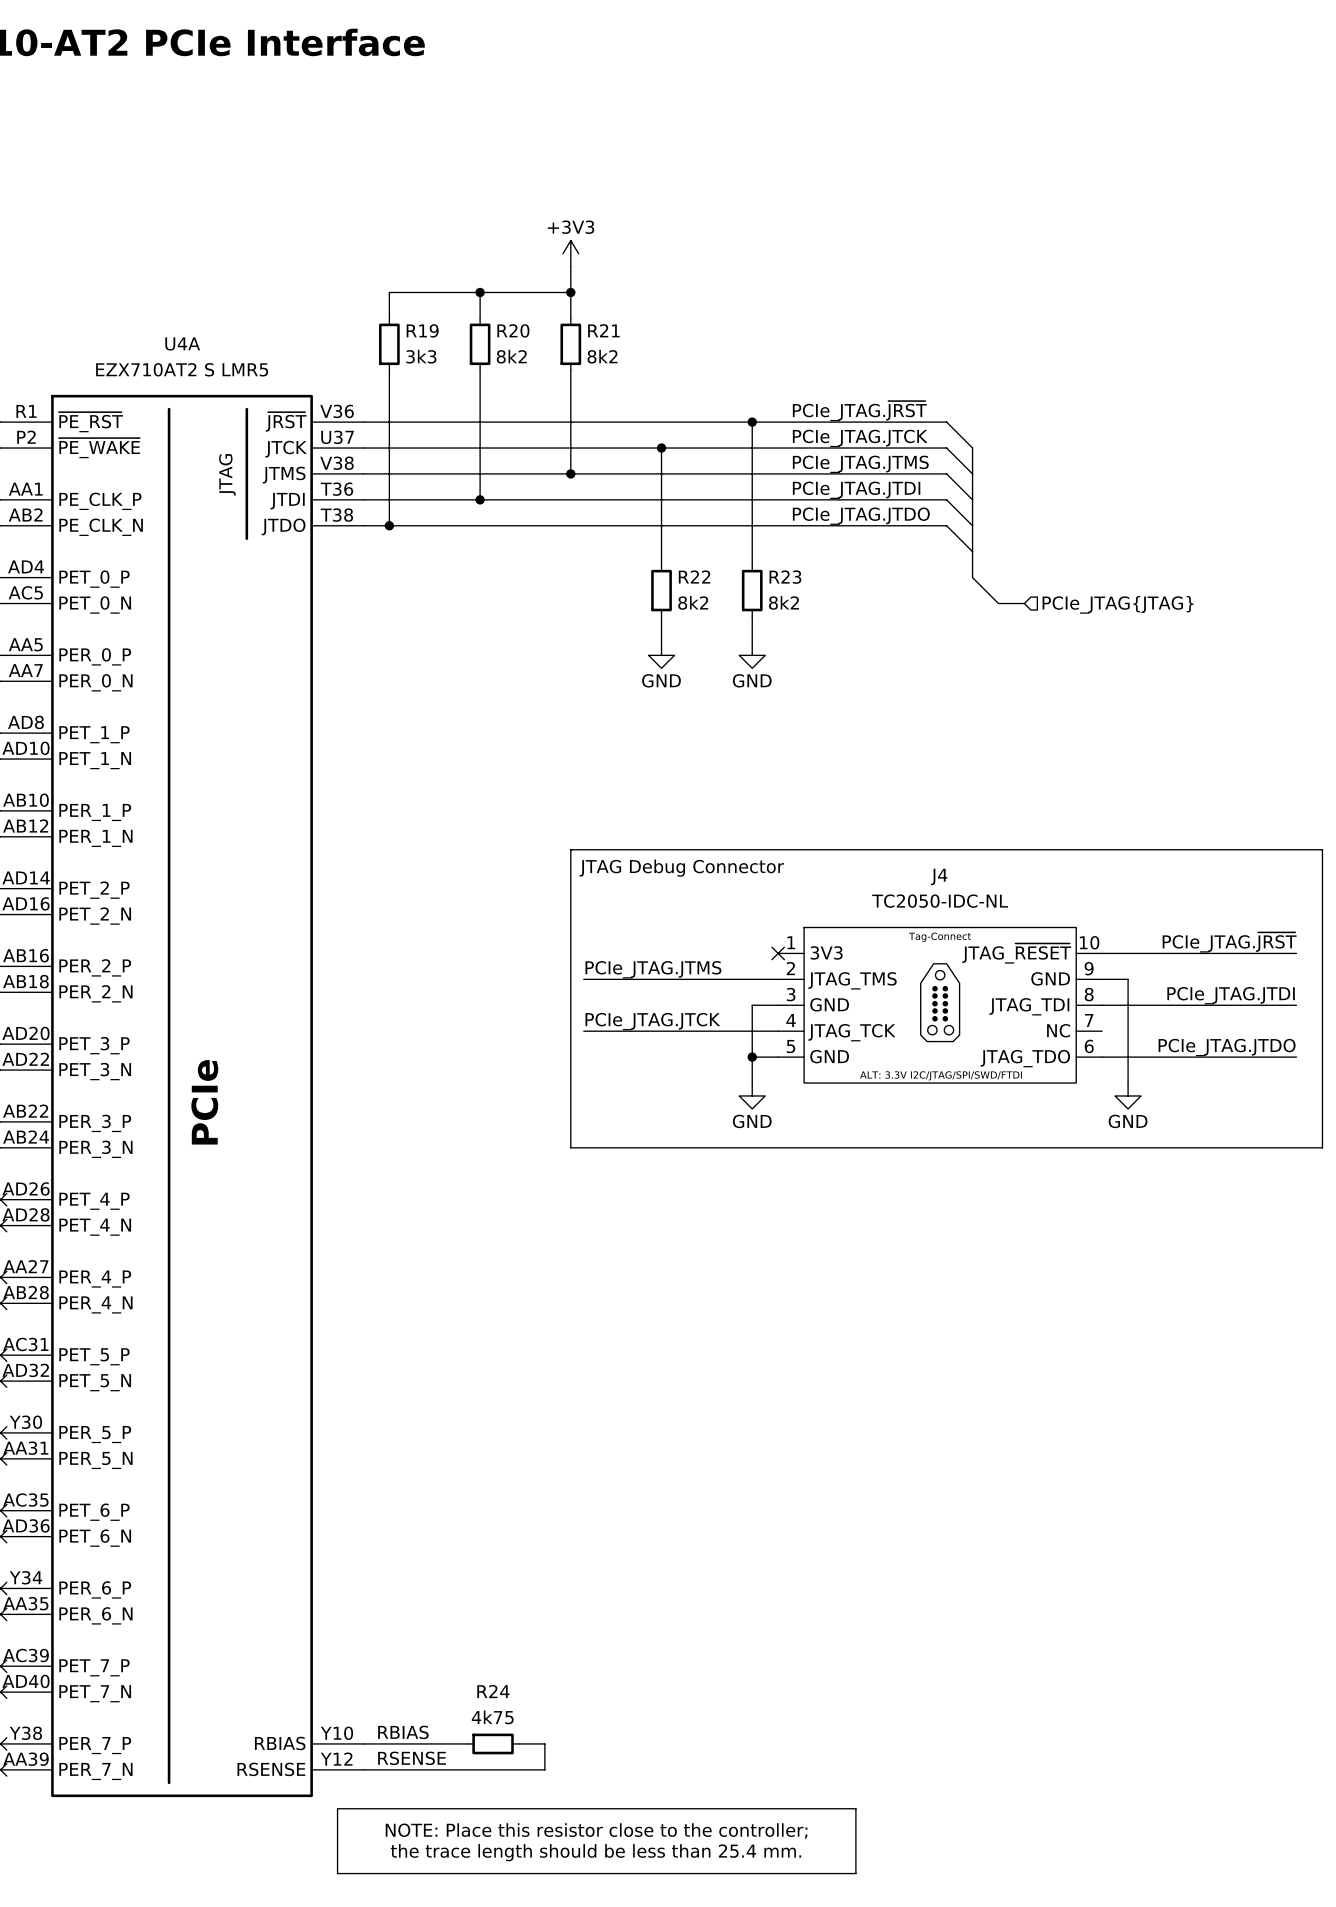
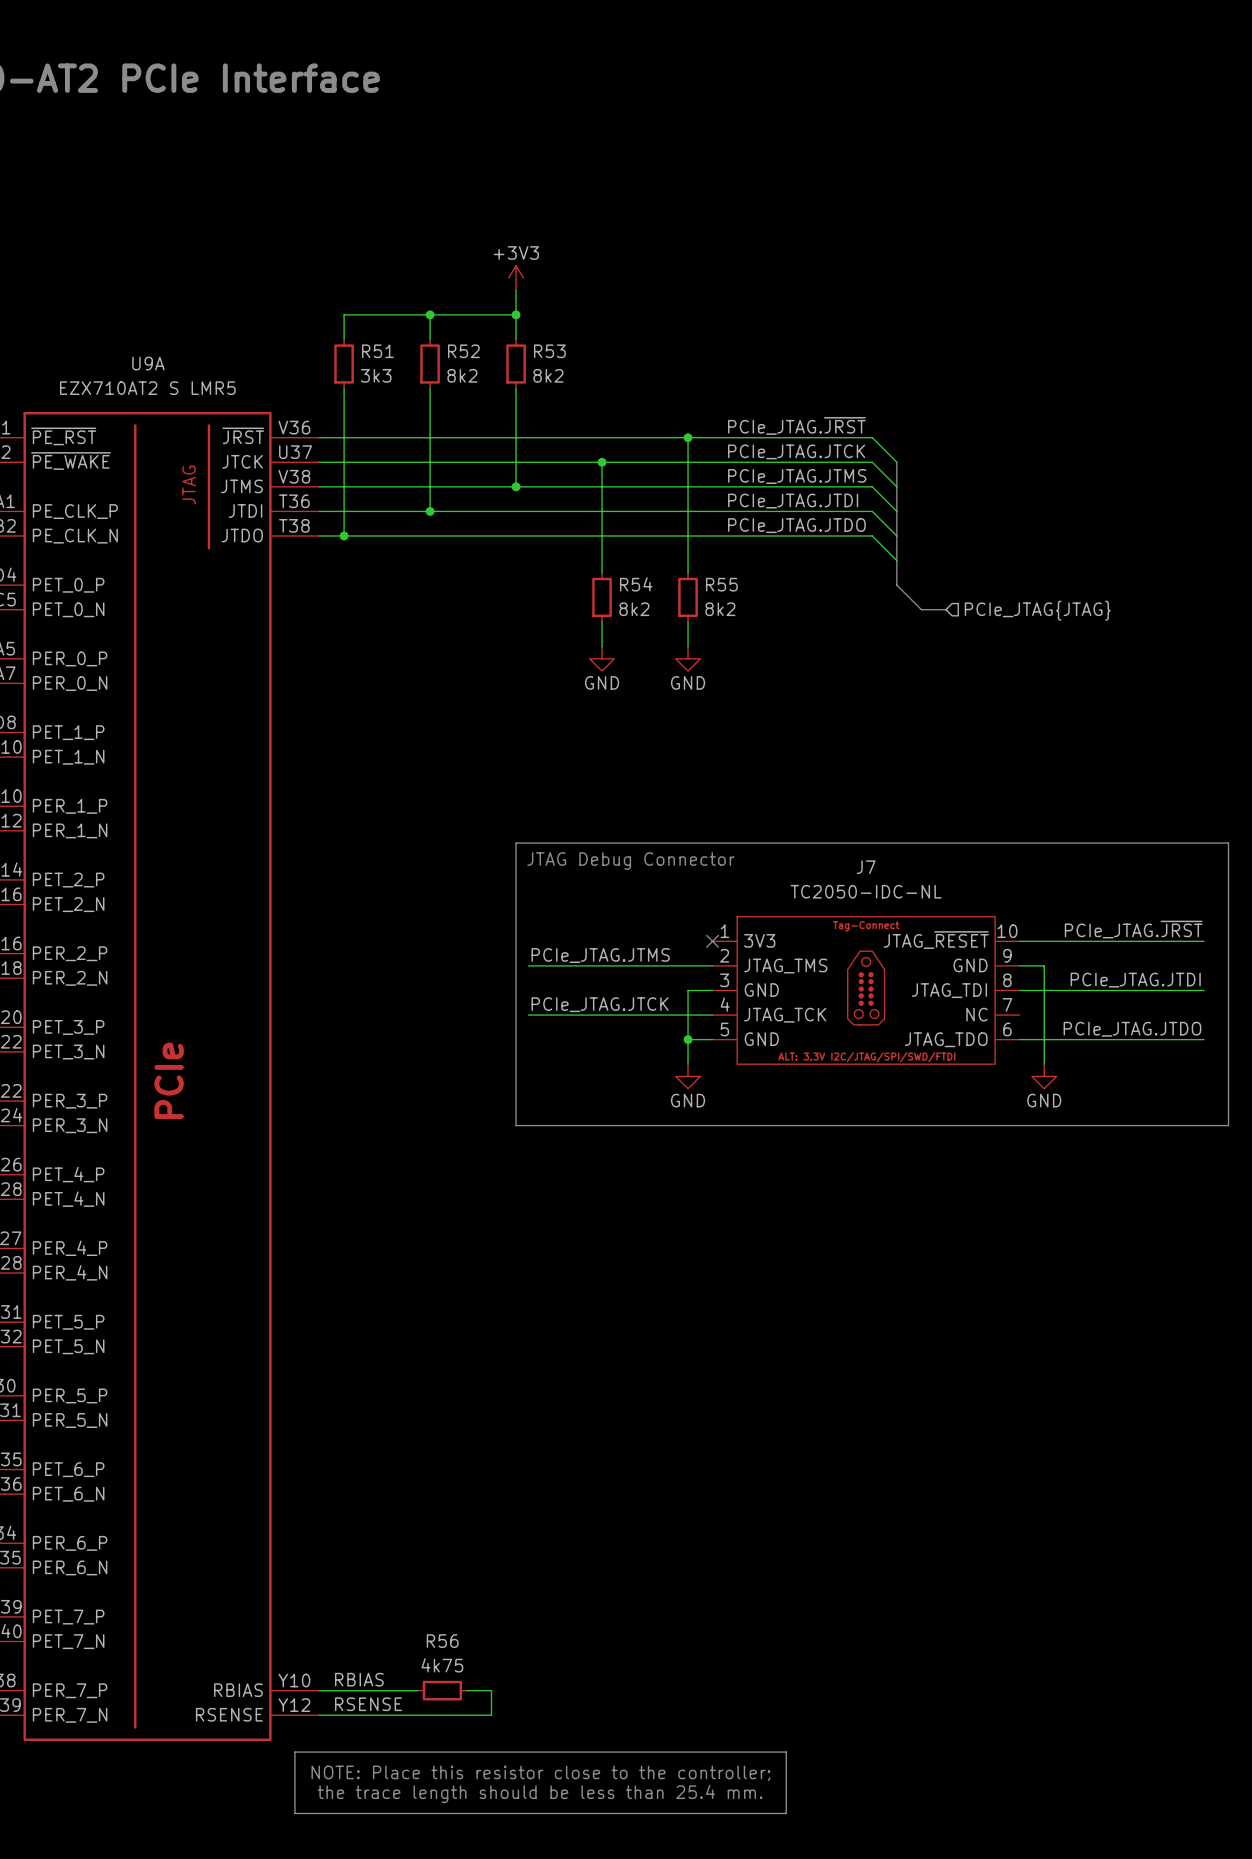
R19 name: R19 (422, 330) -> R51 (377, 351)
R20 name: R20 (513, 330) -> R52 (463, 351)
R21 name: R21 (603, 330) -> R53 (549, 351)
U4A name: U4A (182, 343) -> U9A (148, 363)
R22 name: R22 (694, 577) -> R54 (636, 584)
R23 name: R23 (785, 577) -> R55 (721, 584)
J4 name: J4 (939, 876) -> J7 (866, 867)
R24 name: R24 (493, 1691) -> R56 (442, 1641)

